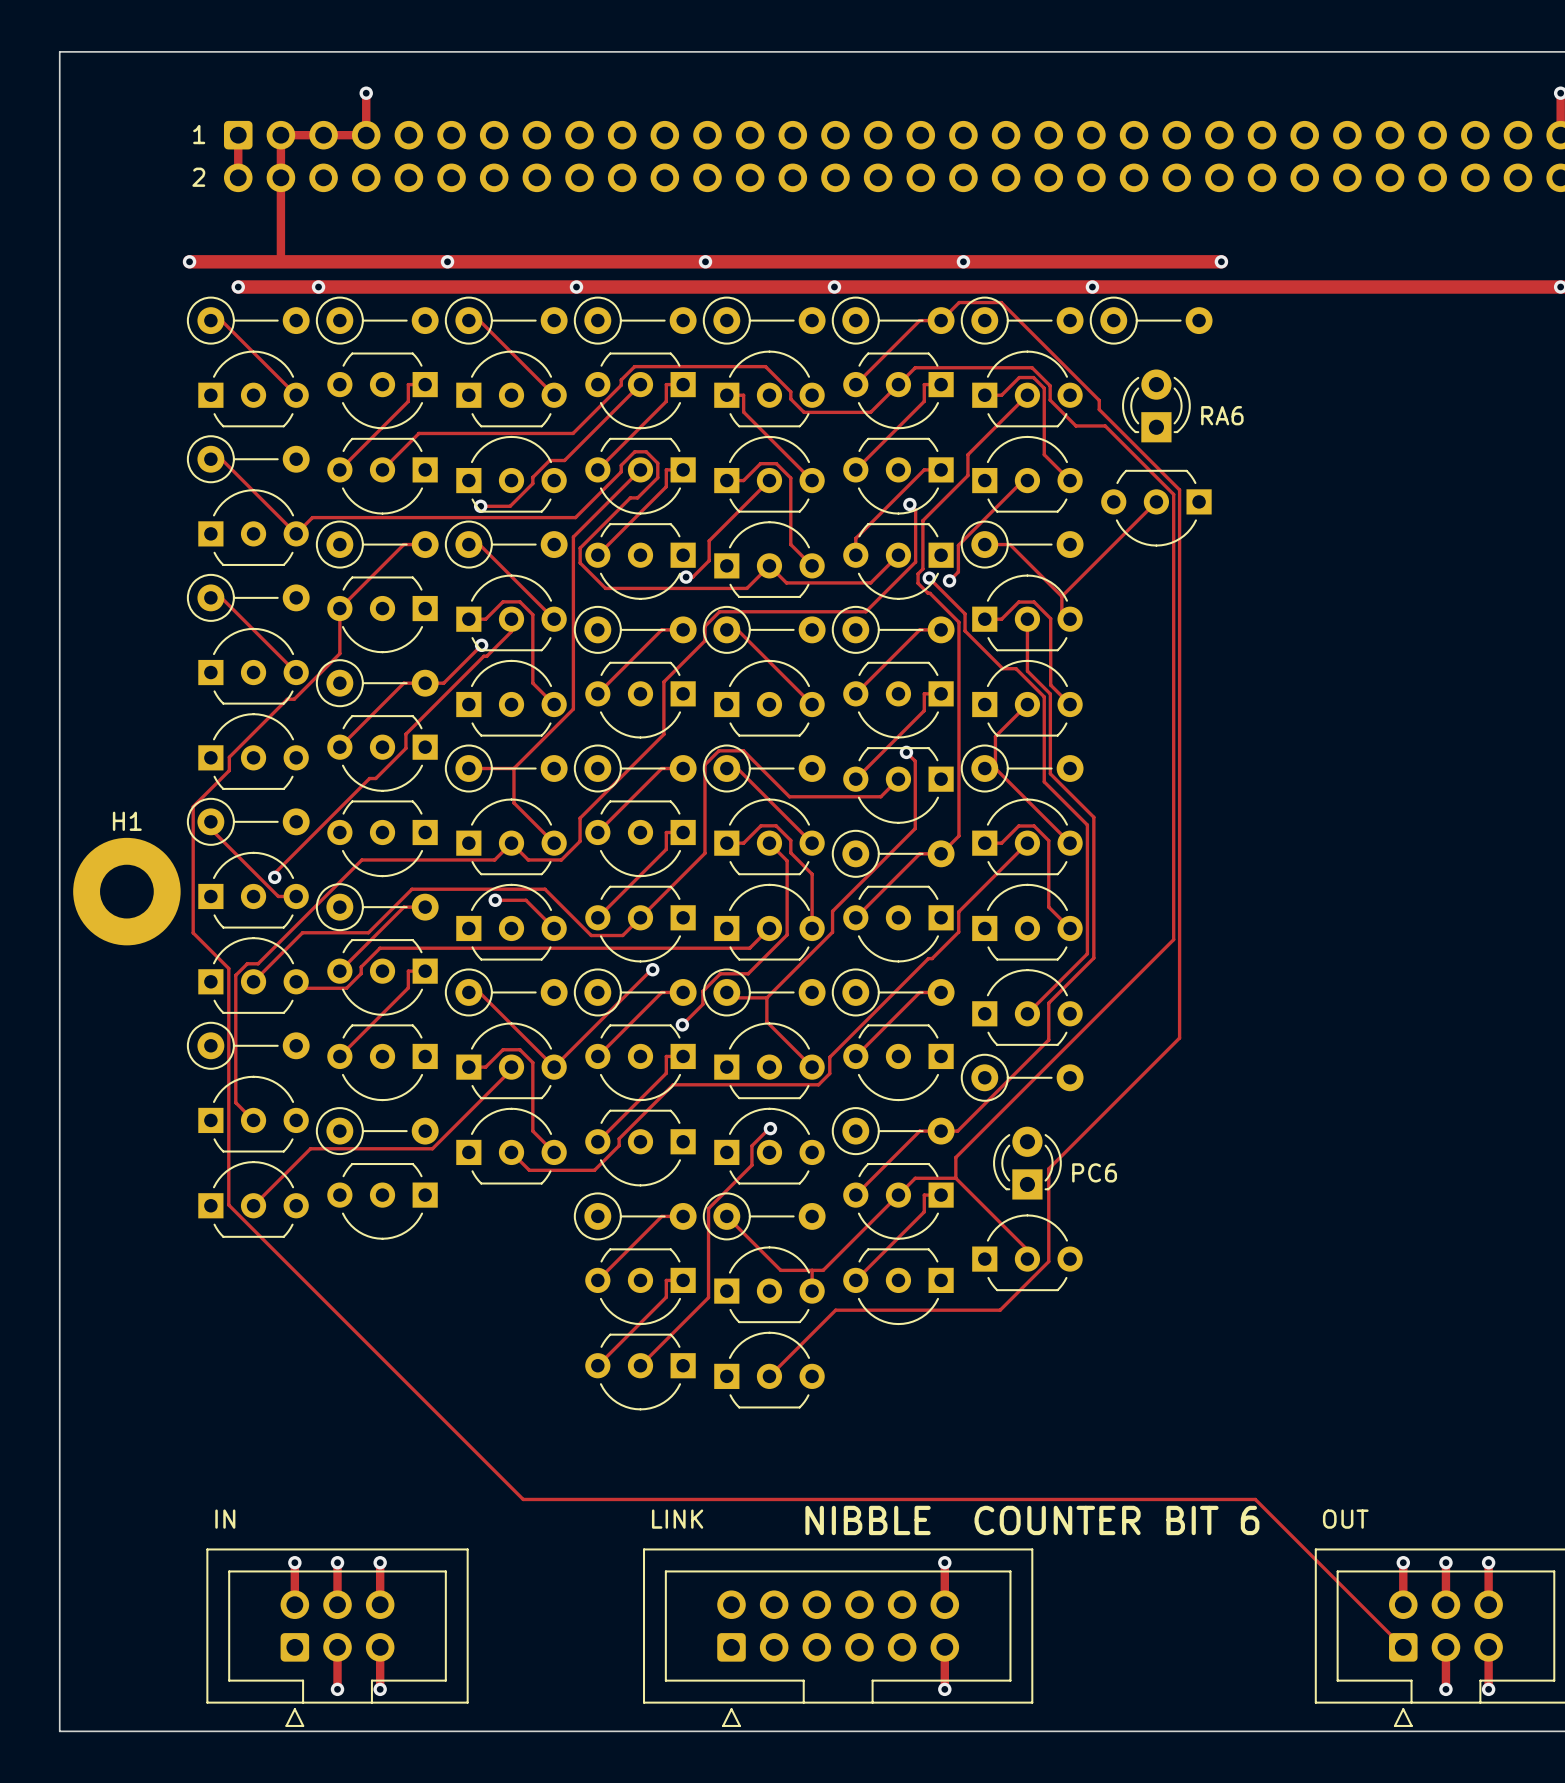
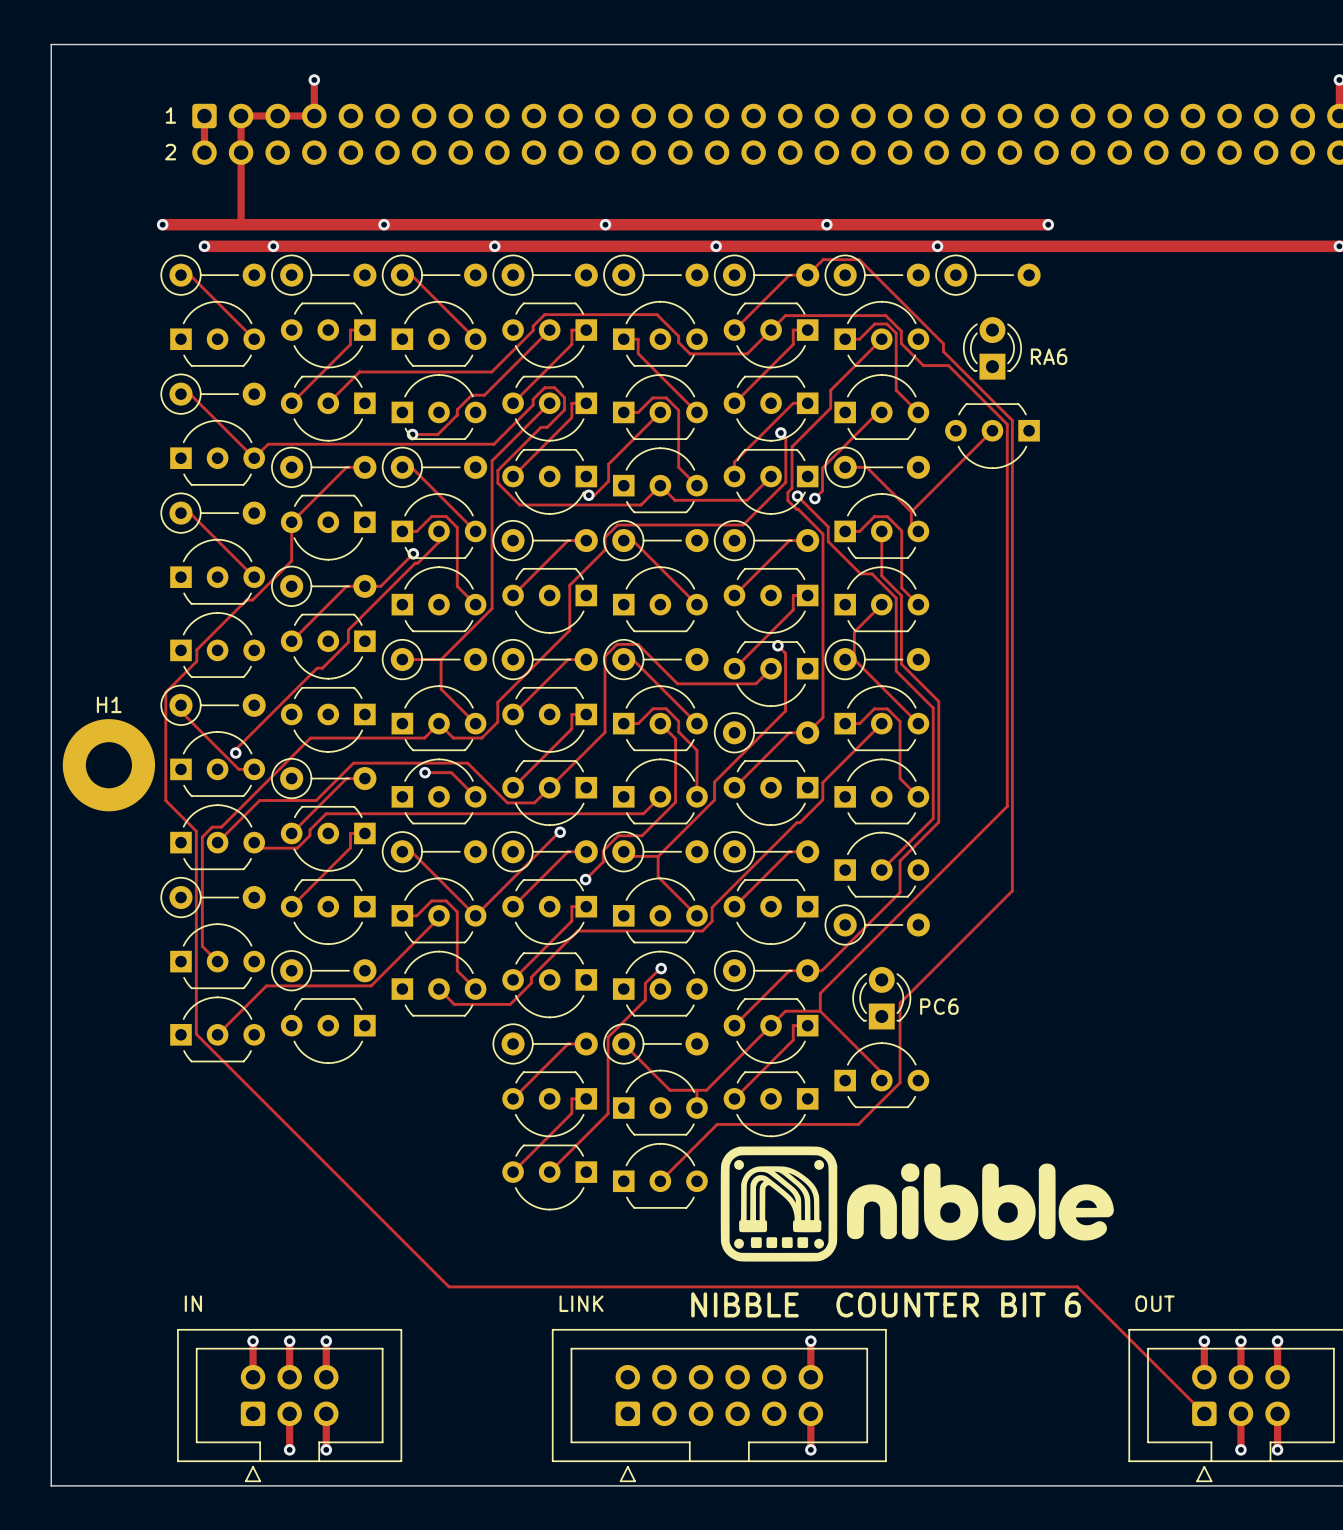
drawing: none -> [720, 1146, 1114, 1262]

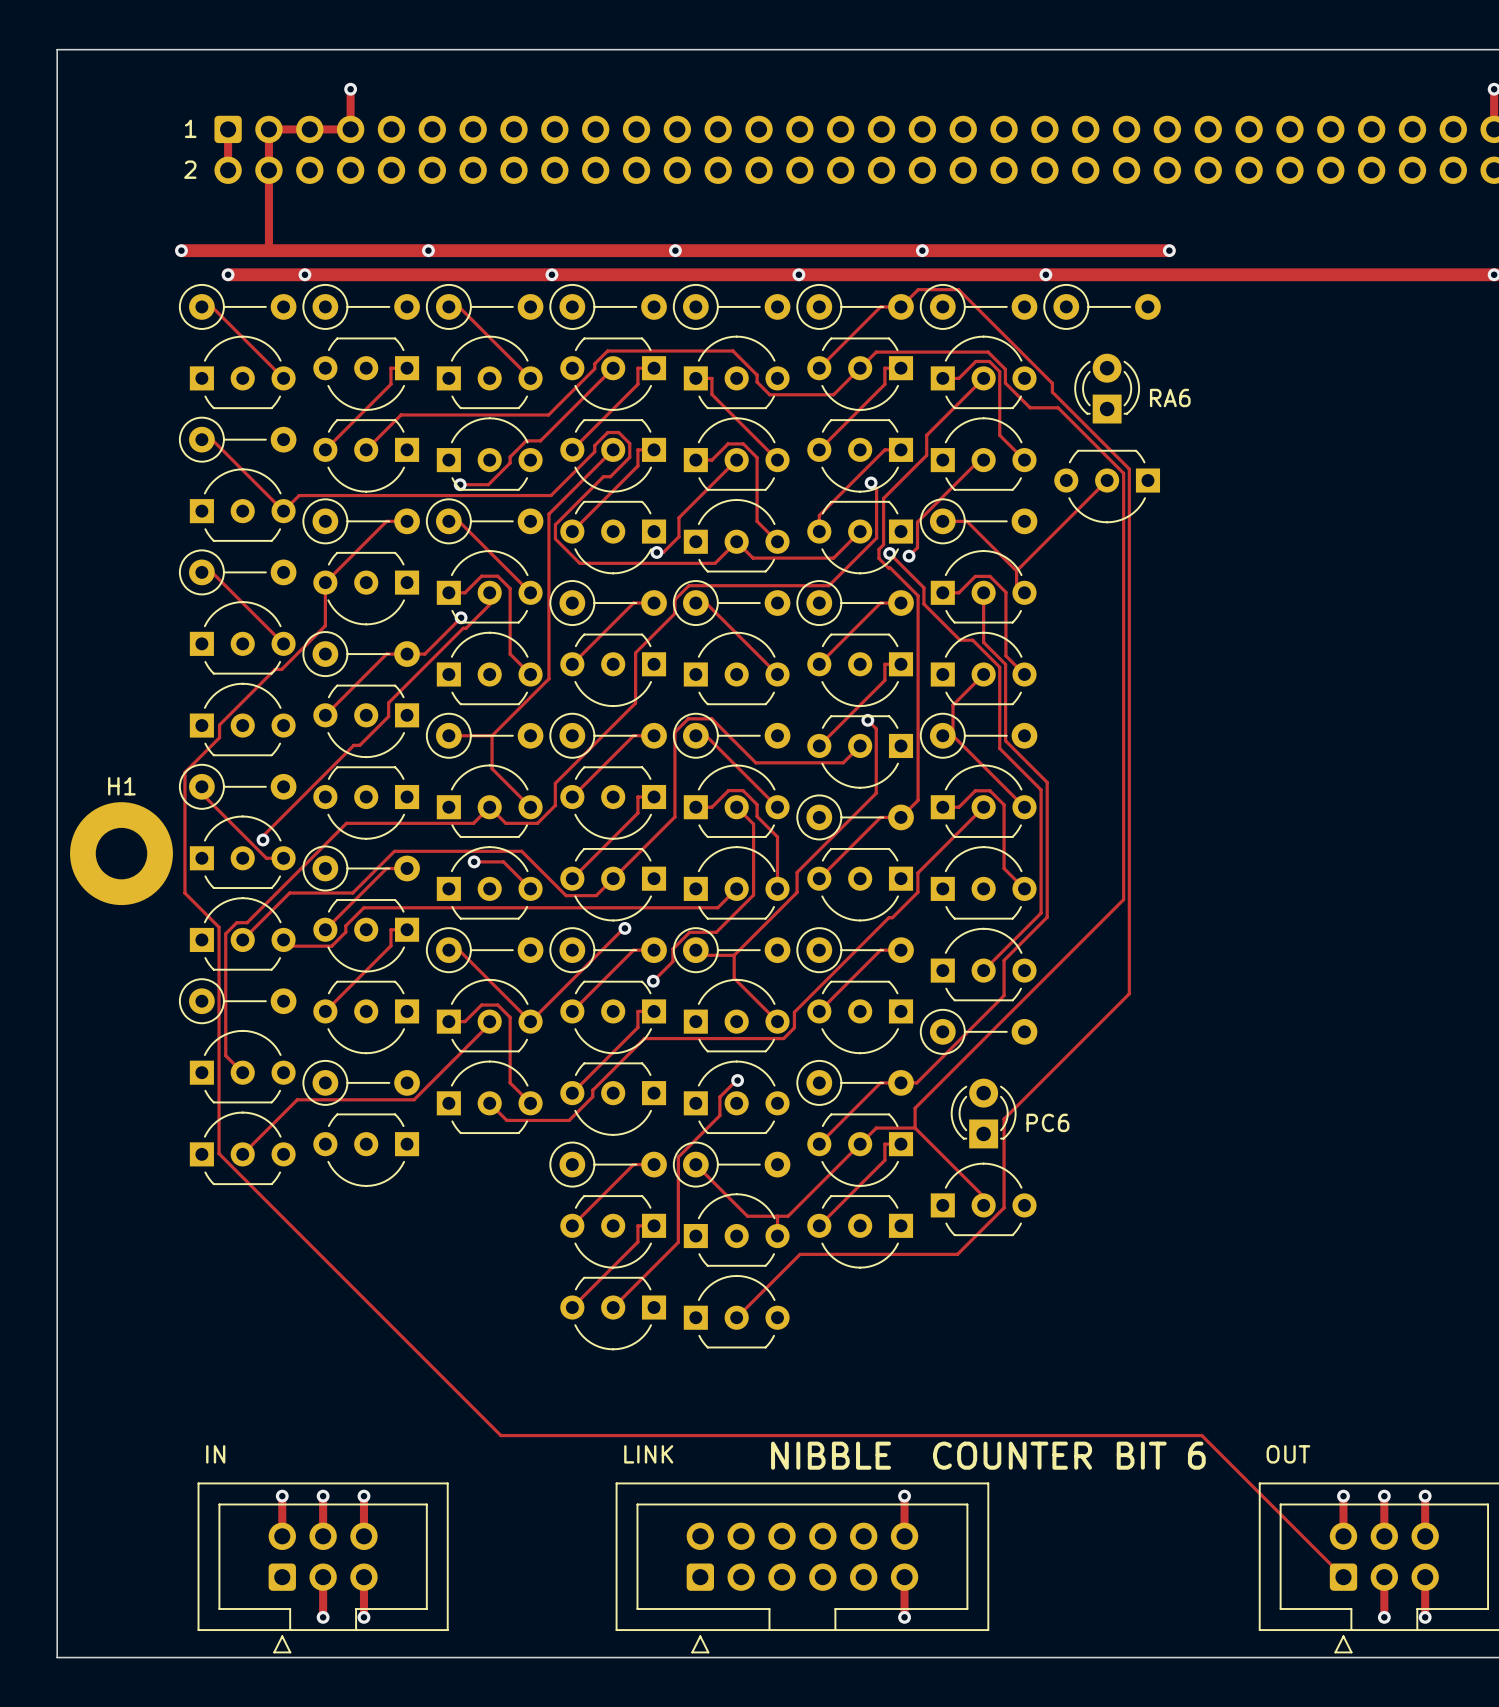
drawing: [720, 1146, 1114, 1262] -> none

